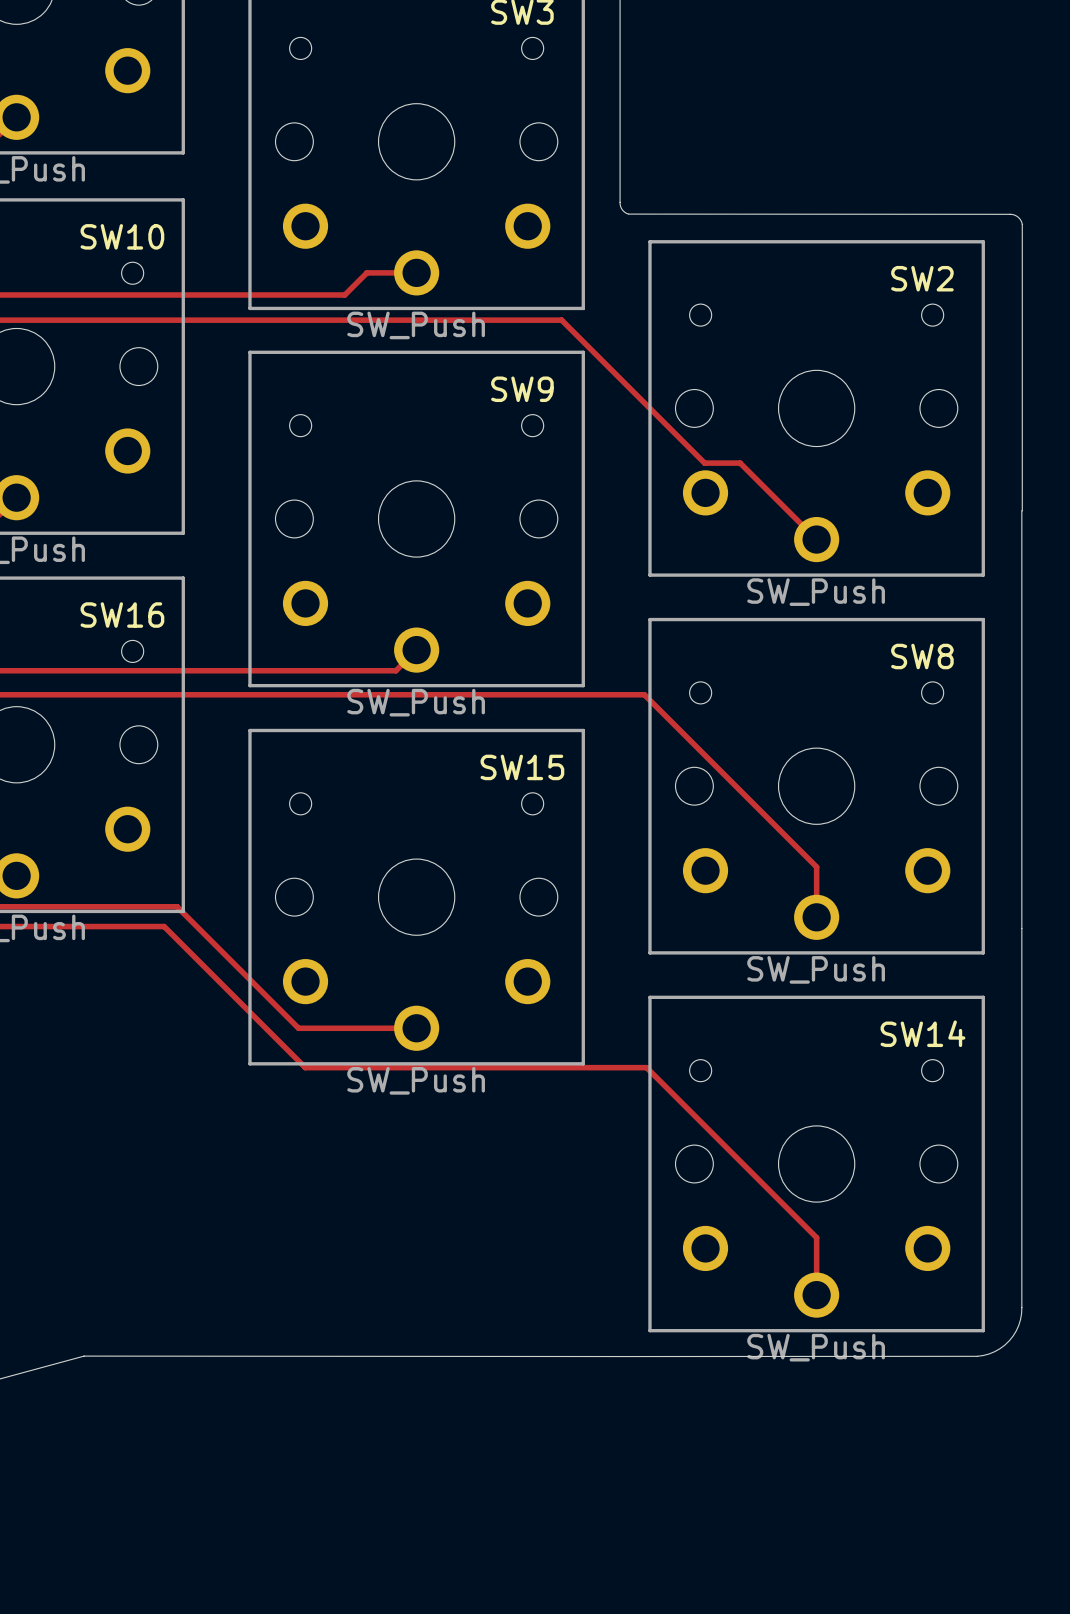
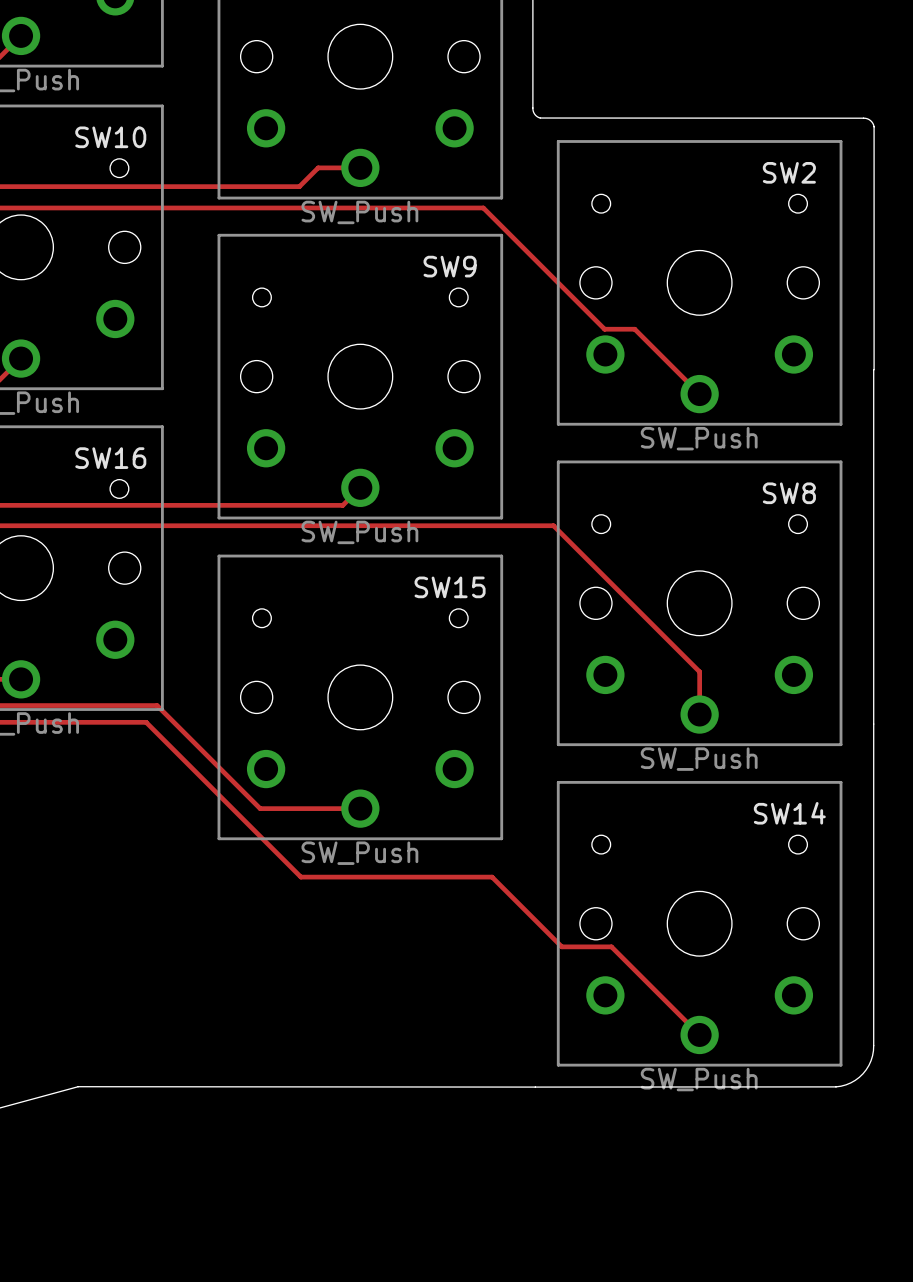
top track: (305, 1067) (646, 1067) (816, 1237) (816, 1295) -> (265, 842) (300, 877) (492, 877) (561, 946) (611, 946) (699, 1034)

